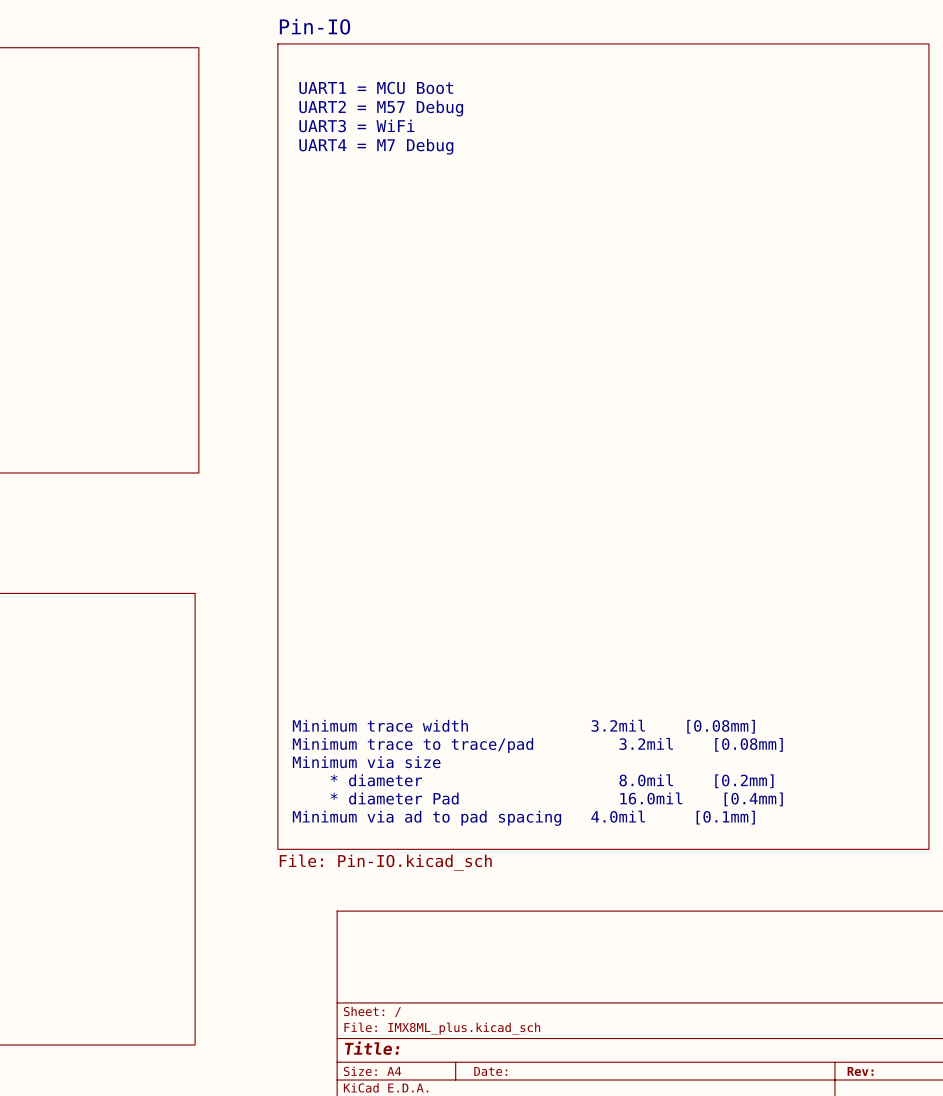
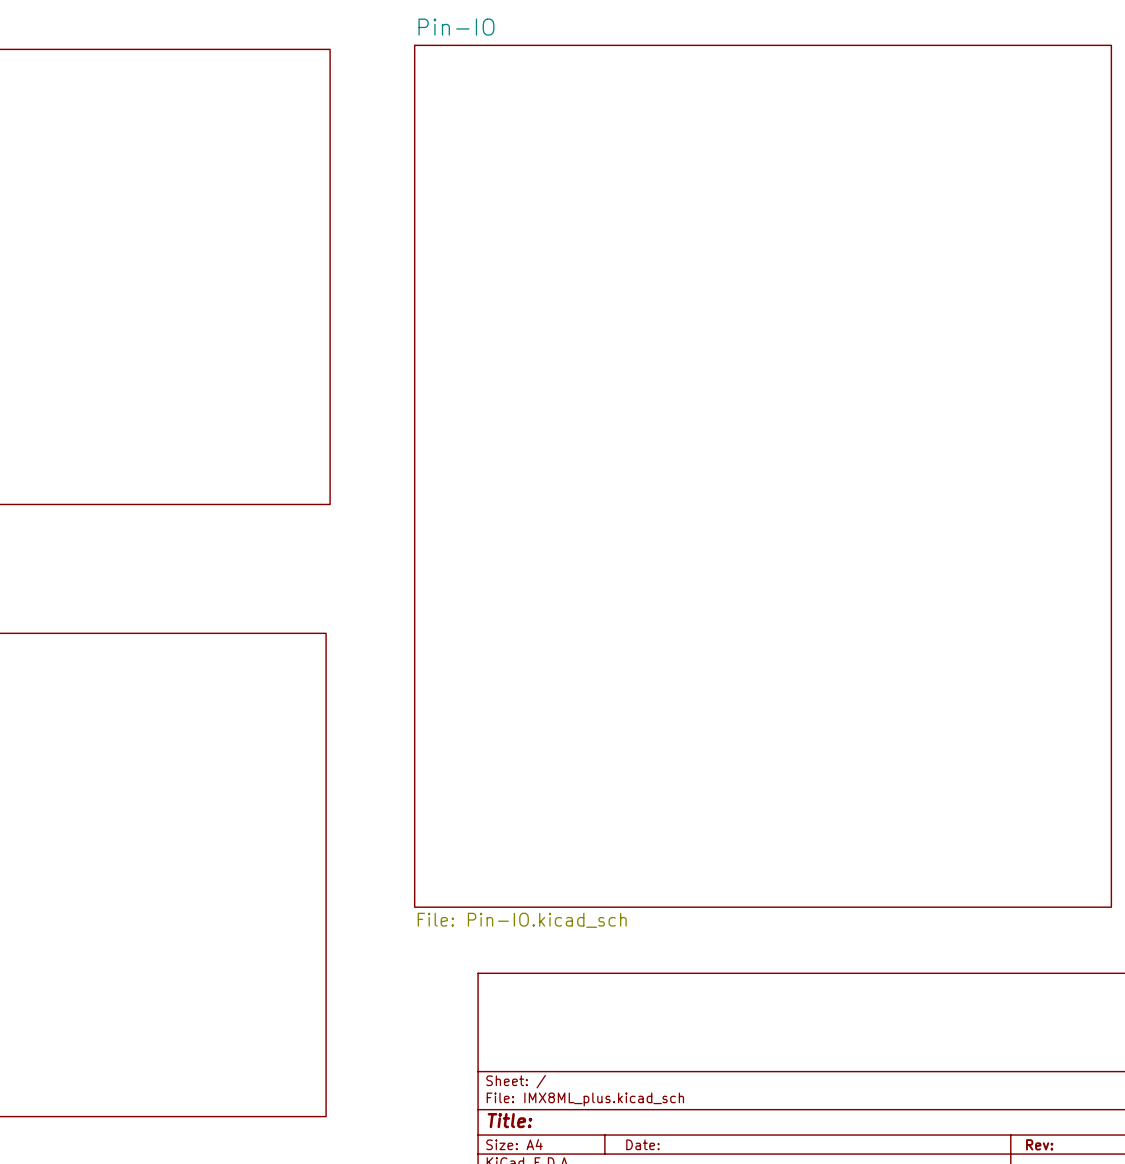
text: UART1 = MCU Boot (376, 87) -> none
text: UART2 = M57 Debug (381, 108) -> none
text: UART3 = WiFi (356, 125) -> none
text: UART4 = M7 Debug (376, 146) -> none
text: Minimum trace width 3.2mil [0.08mm] (523, 726) -> none
text: Minimum trace to trace/pad 3.2mil [0.08mm] (537, 745) -> none
text: Minimum via size (366, 762) -> none
text: * diameter 8.0mil [0.2mm] (552, 781) -> none
text: * diameter Pad 16.0mil [0.4mm] (556, 799) -> none
text: Minimum via ad to pad spacing 4.0mil [0.1mm] (523, 818) -> none

